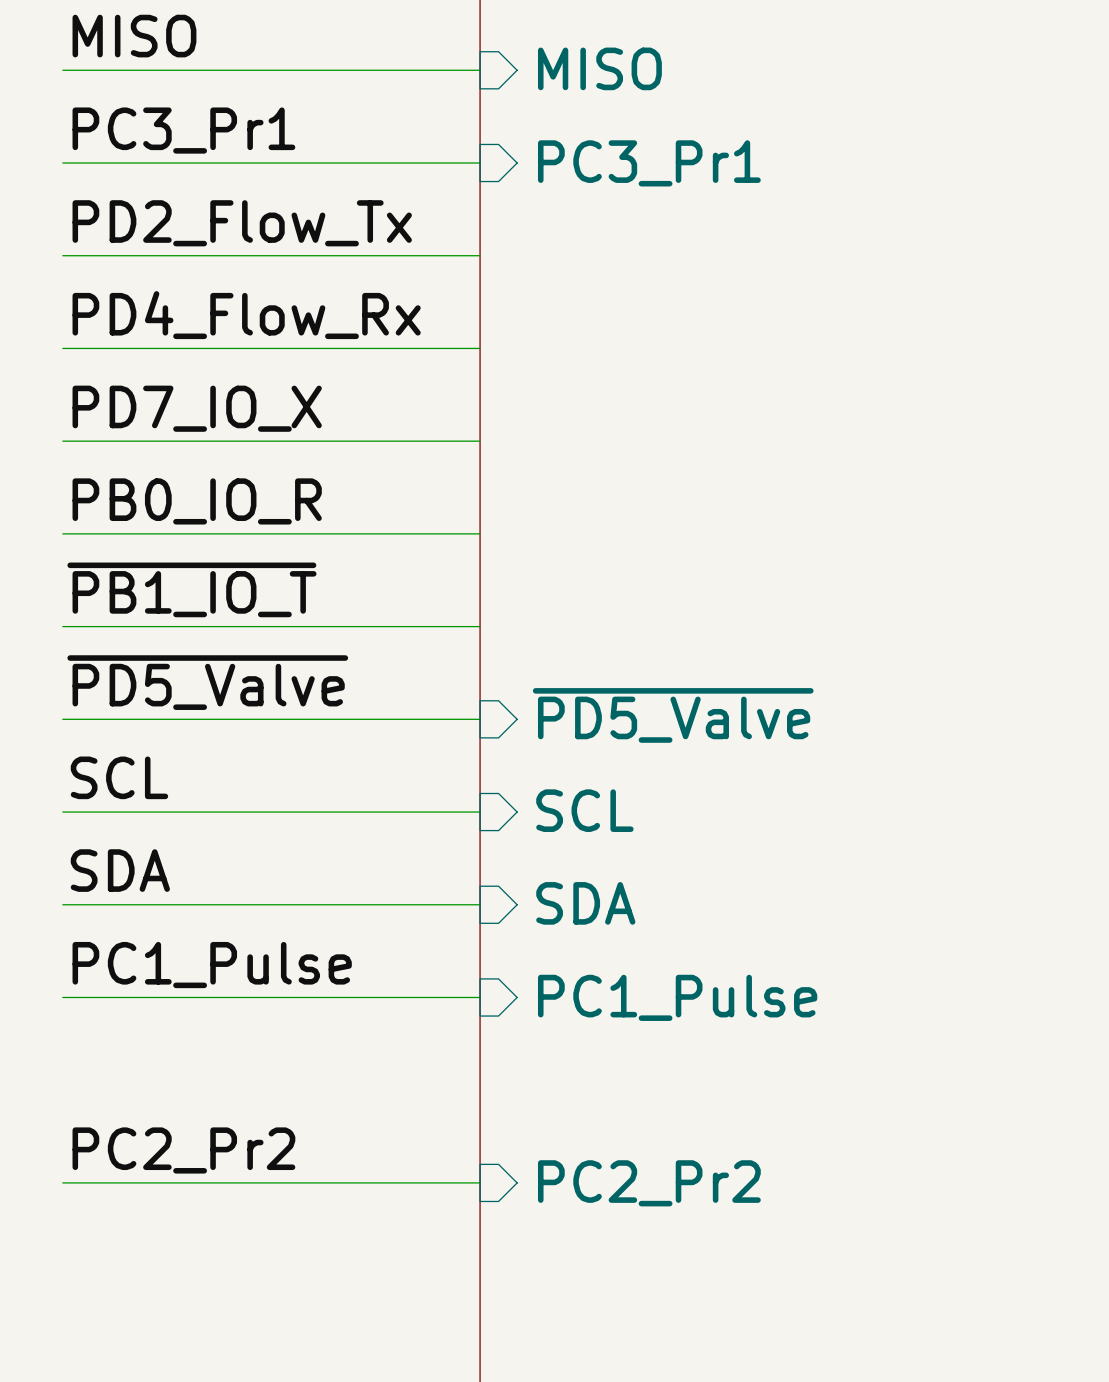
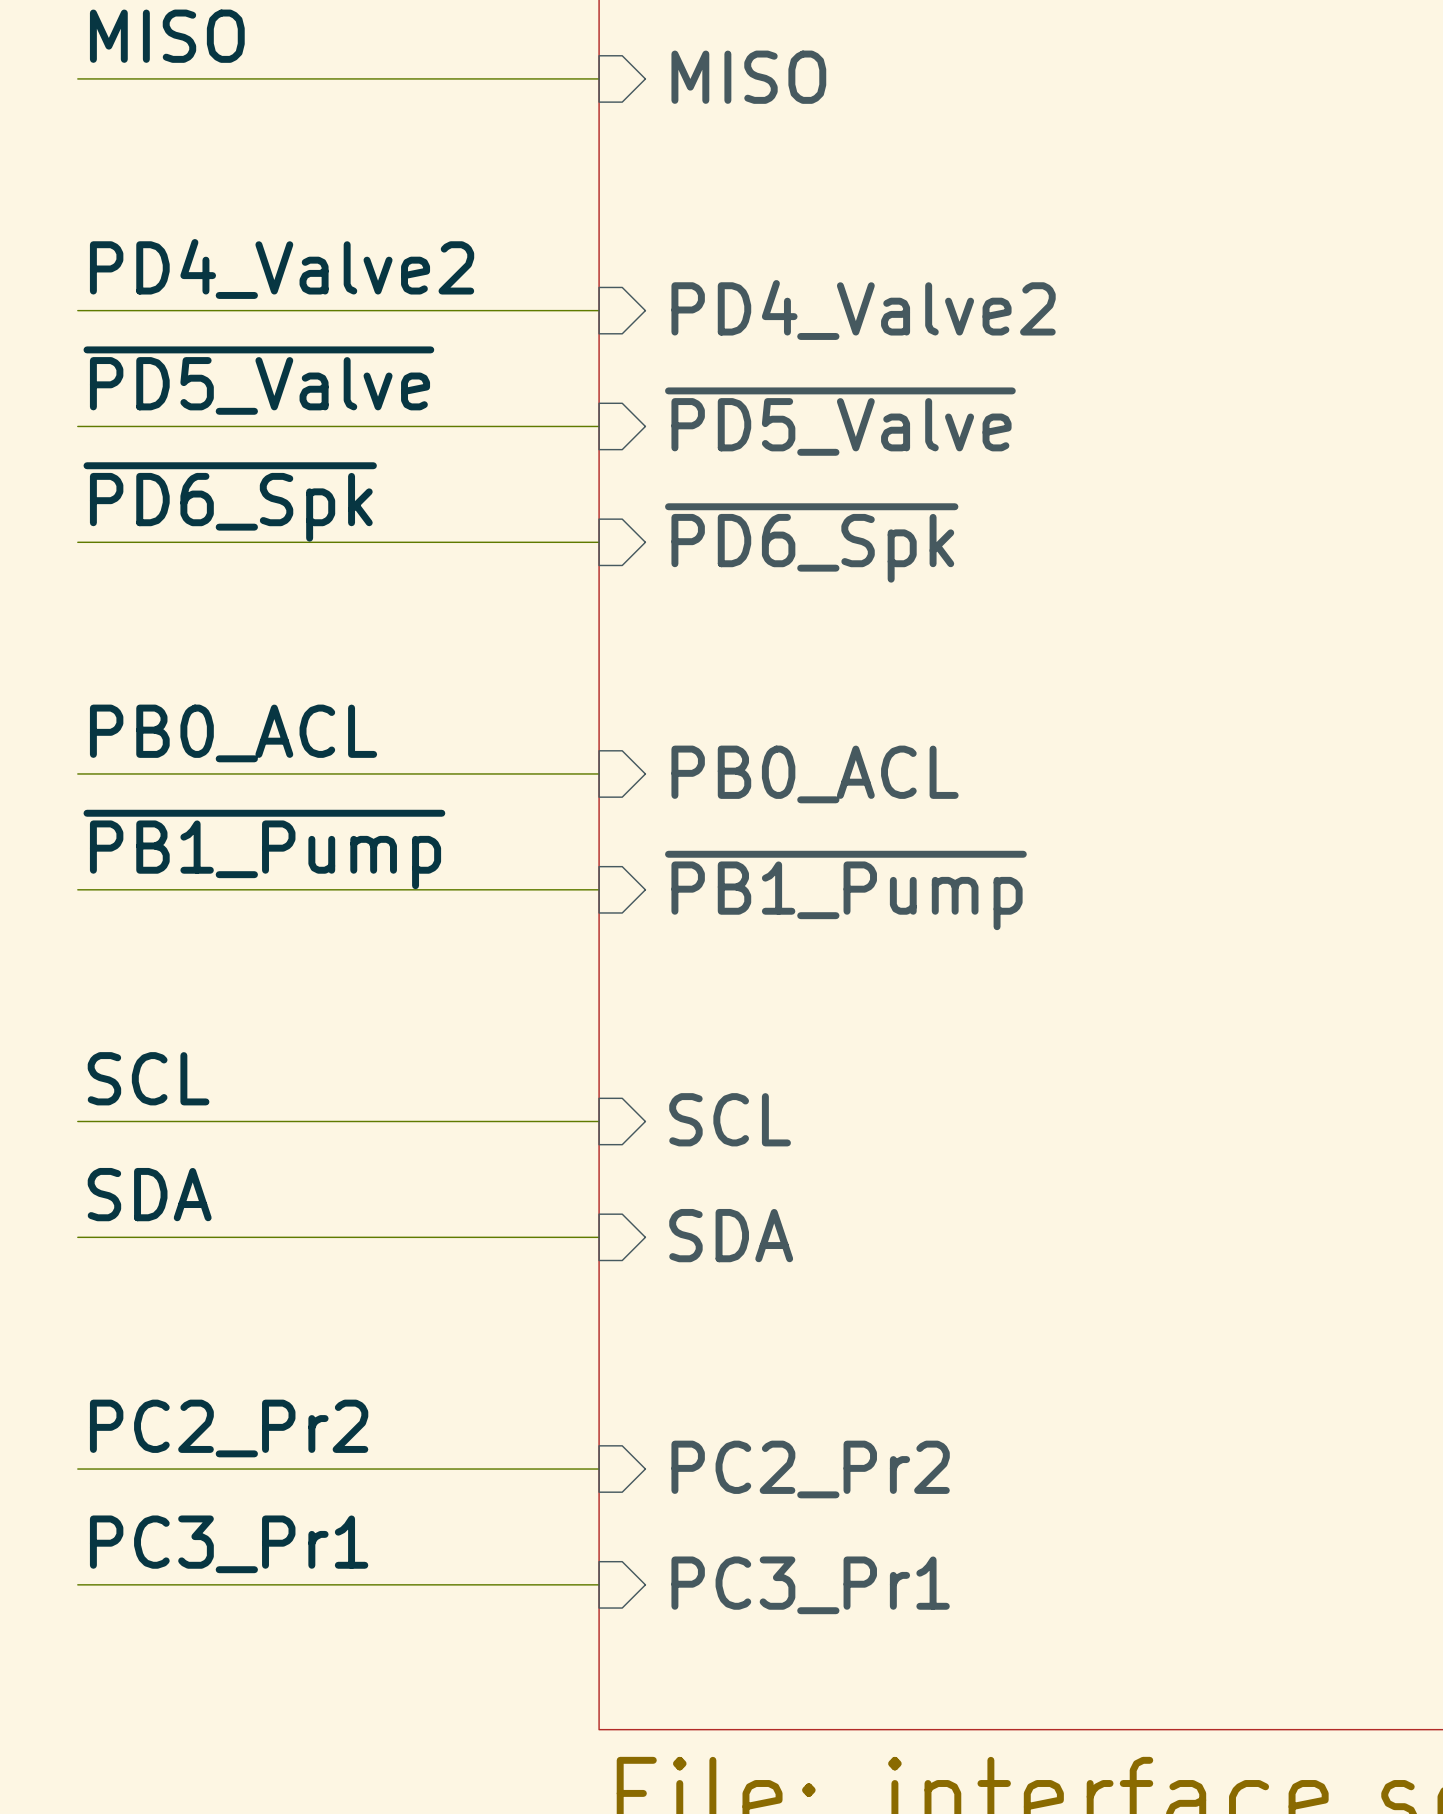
label: PC3_Pr1 (183, 130) -> none
wire: (62, 163) (480, 163) -> none
sheet pin: PC3_Pr1 (649, 163) -> none
label: PD2_Flow_Tx (242, 223) -> PD4_Valve2 (282, 268)
sheet pin: none -> PD4_Valve2 (863, 309)
label: PD4_Flow_Rx (246, 315) -> ~{PD5_Valve} (258, 380)
sheet pin: none -> ~{PD5_Valve} (840, 421)
label: PD7_IO_X (197, 408) -> ~{PD6_Spk} (230, 501)
sheet pin: none -> ~{PD6_Spk} (811, 542)
label: PB0_IO_R (197, 501) -> none
wire: (62, 533) (480, 533) -> none
label: ~{PB1_IO_T} (191, 589) -> PB0_ACL (233, 733)
sheet pin: none -> PB0_ACL (815, 774)
label: ~{PD5_Valve} (207, 682) -> ~{PB1_Pump} (264, 849)
sheet pin: ~{PD5_Valve} (673, 715) -> ~{PB1_Pump} (845, 890)
label: SCL (119, 777) -> none
sheet pin: SCL (584, 810) -> none
wire: (62, 812) (480, 812) -> (77, 1584) (599, 1584)
label: SDA (120, 870) -> SCL (148, 1078)
sheet pin: SDA (585, 903) -> SCL (730, 1119)
label: PC1_Pulse (212, 965) -> SDA (149, 1194)
sheet pin: PC1_Pulse (677, 997) -> SDA (731, 1235)
label: none -> PC3_Pr1 (229, 1544)
sheet pin: none -> PC3_Pr1 (810, 1585)

